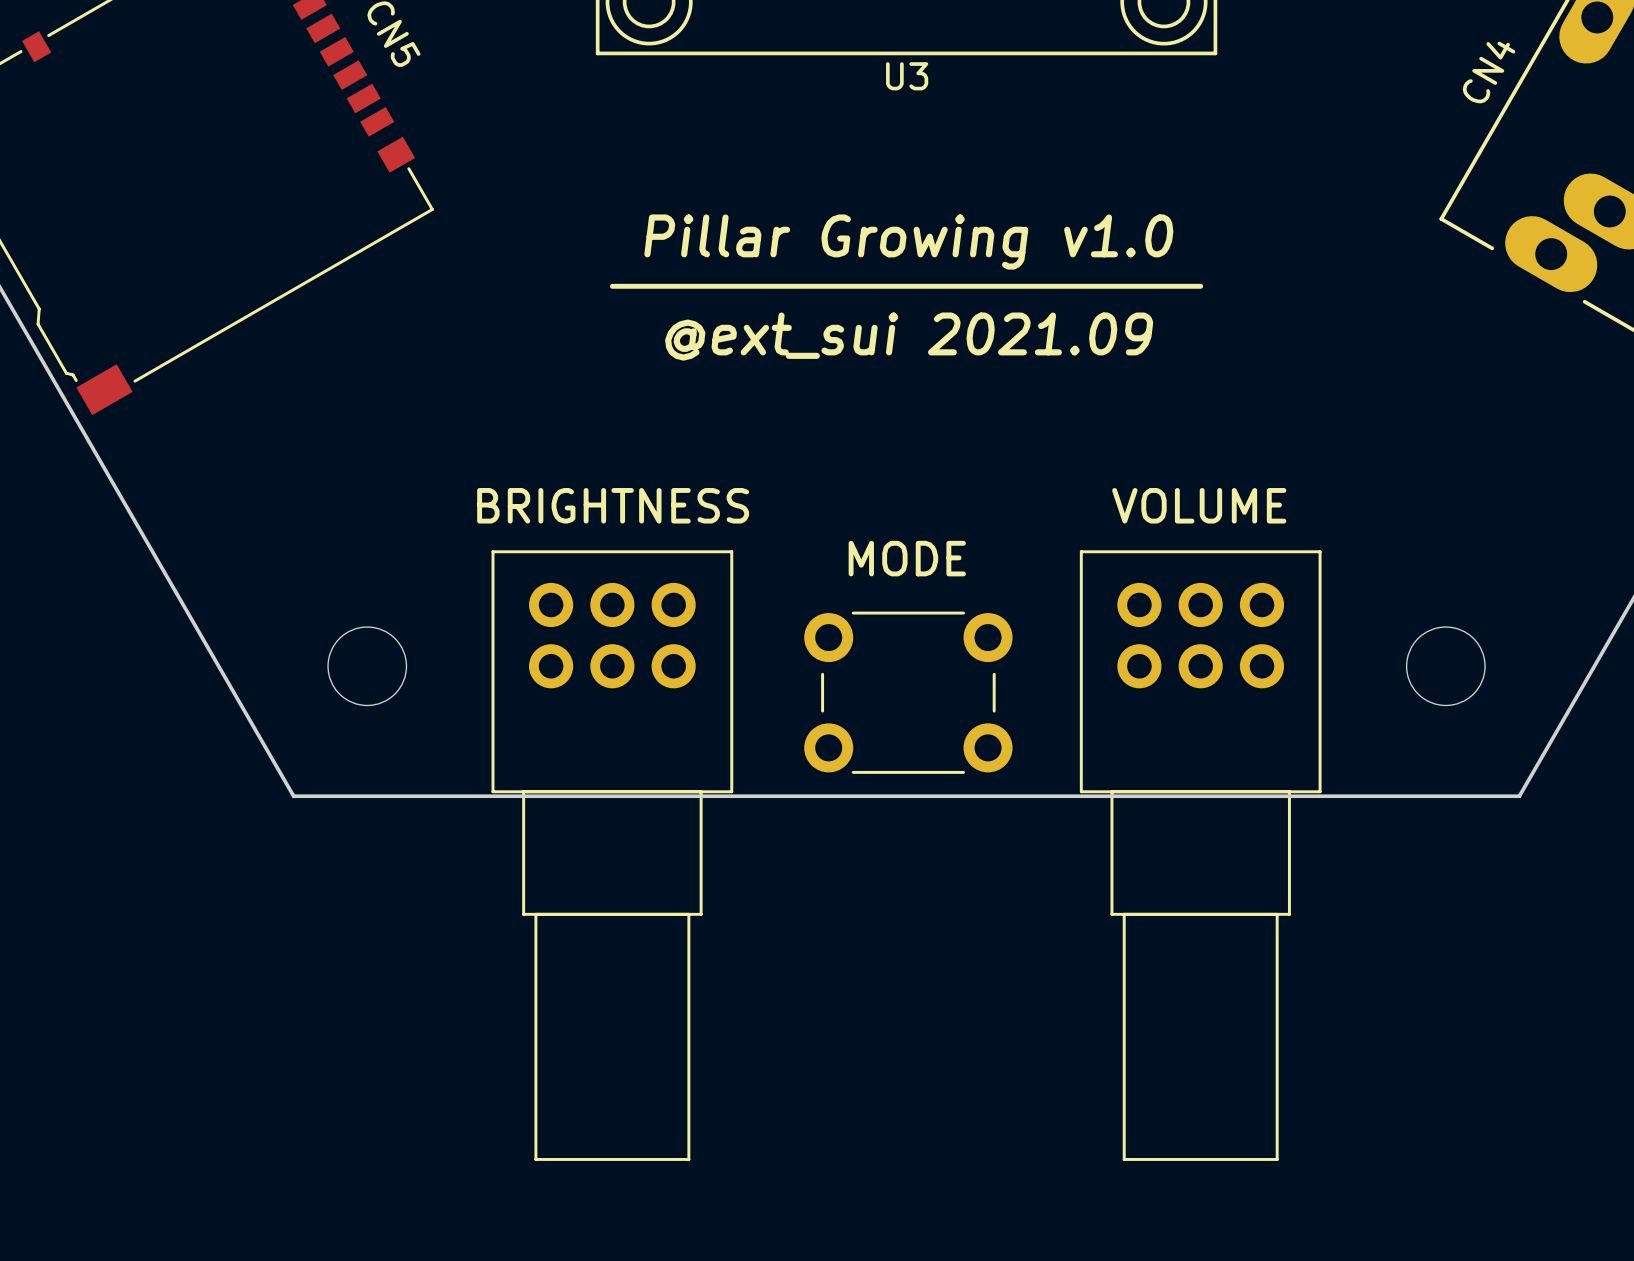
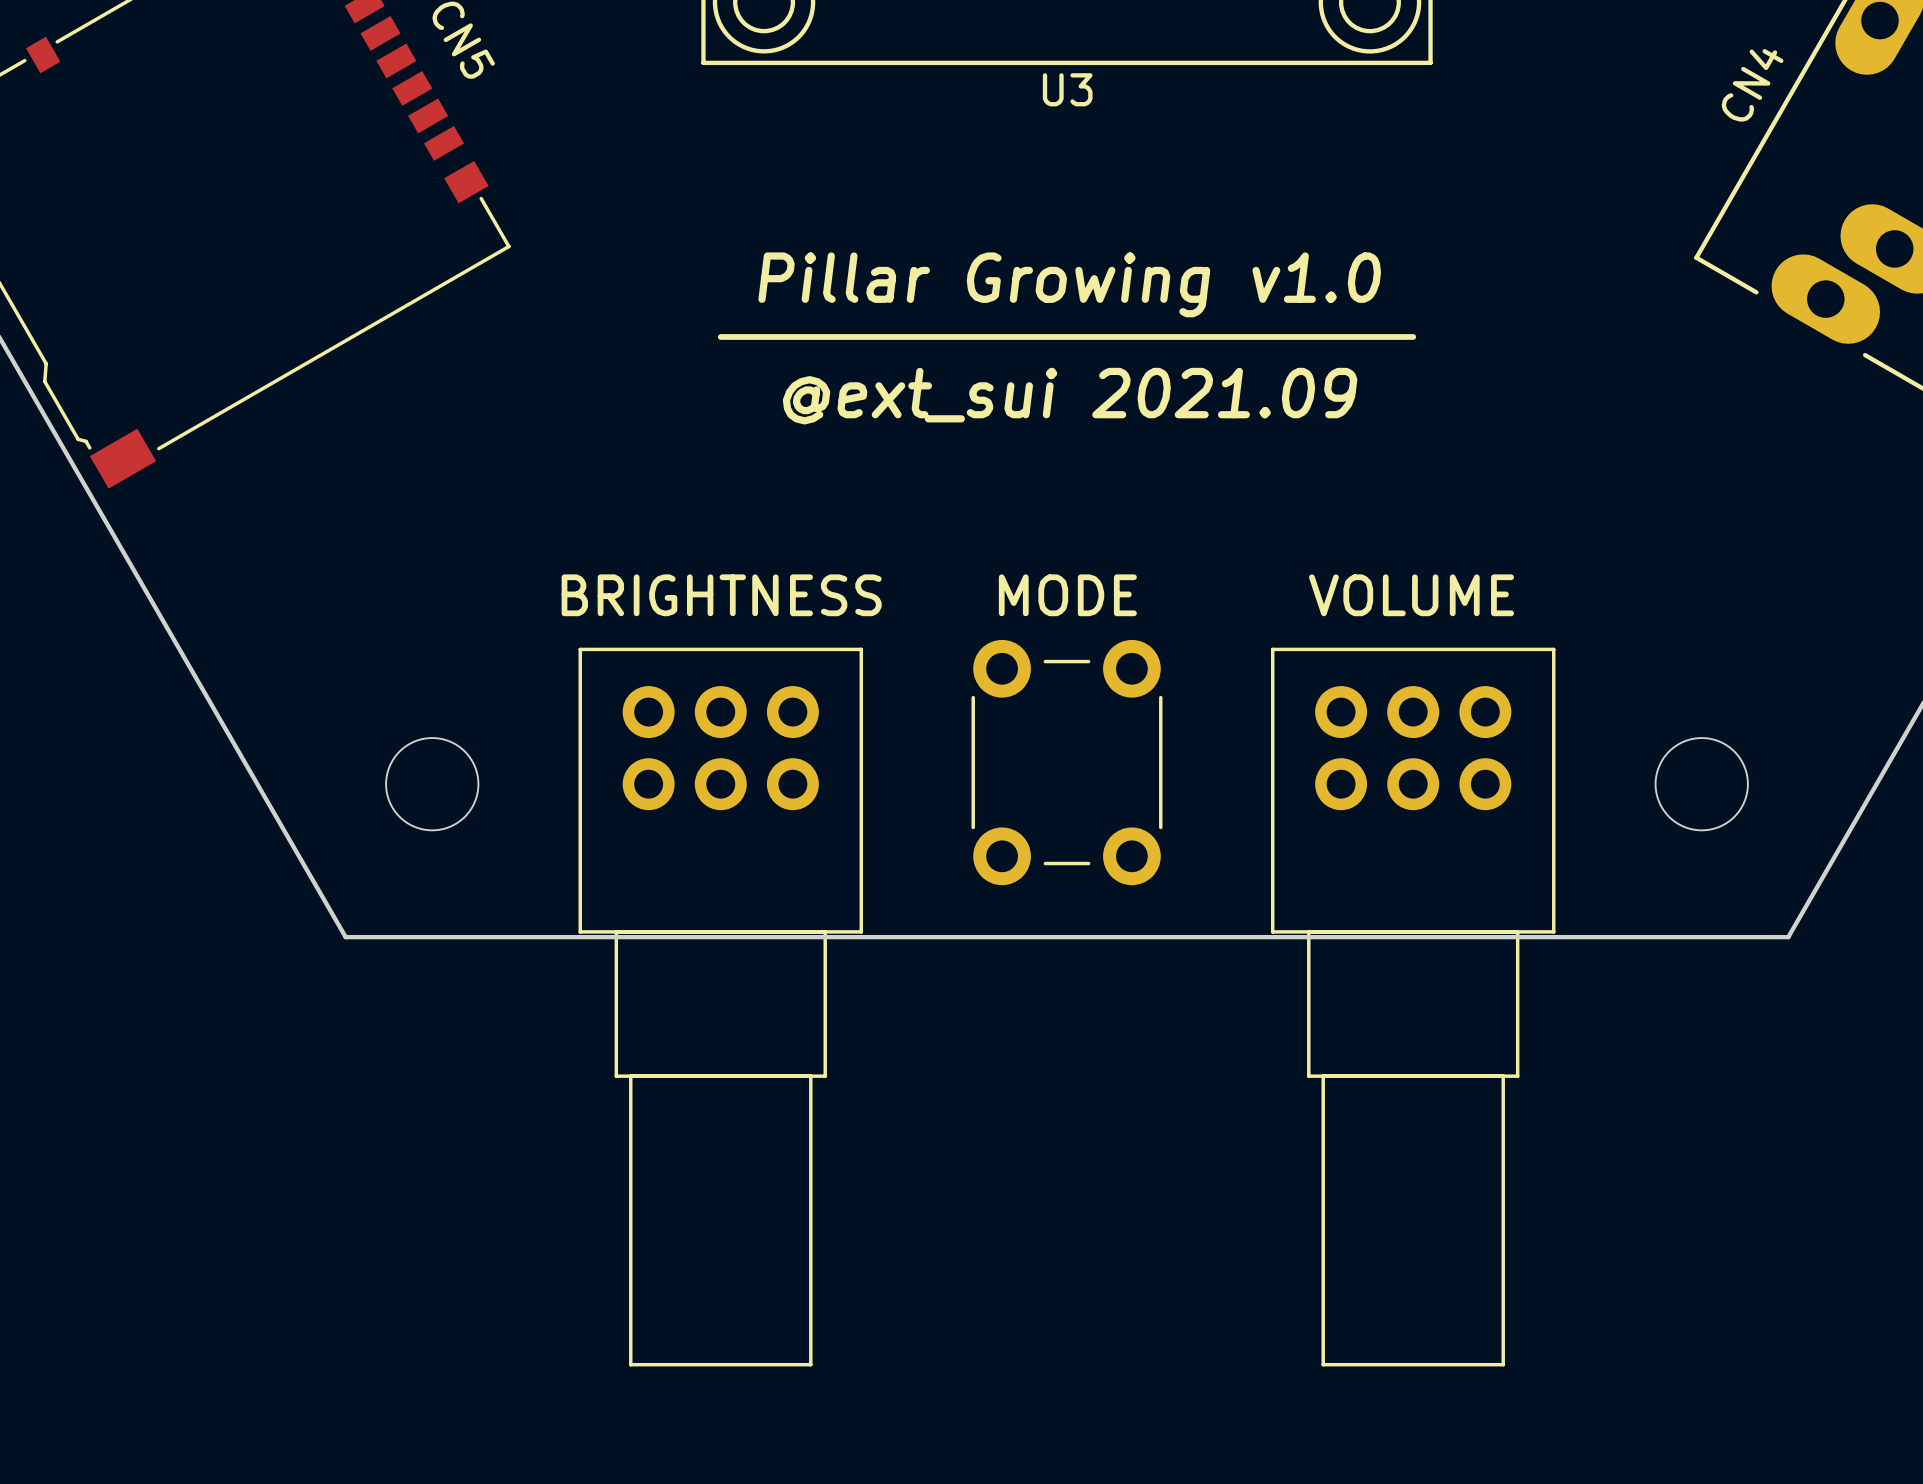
text position: MODE (907, 558) -> MODE (1067, 595)
part rotation: 0° (908, 692) -> 90° clockwise (1067, 762)

